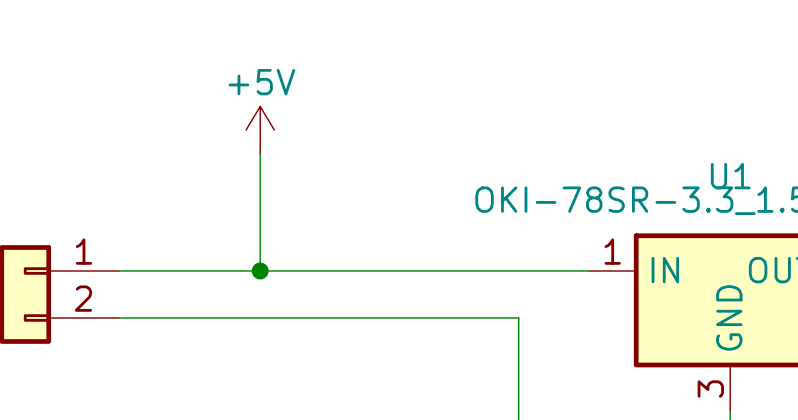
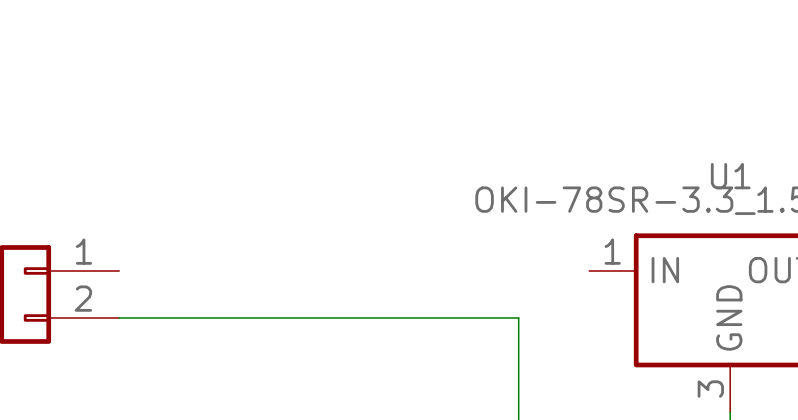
power symbol: +5V (260, 130) -> none
wire: (260, 153) (260, 270) -> none
wire: (119, 270) (589, 270) -> none
junction: (260, 270) -> none

